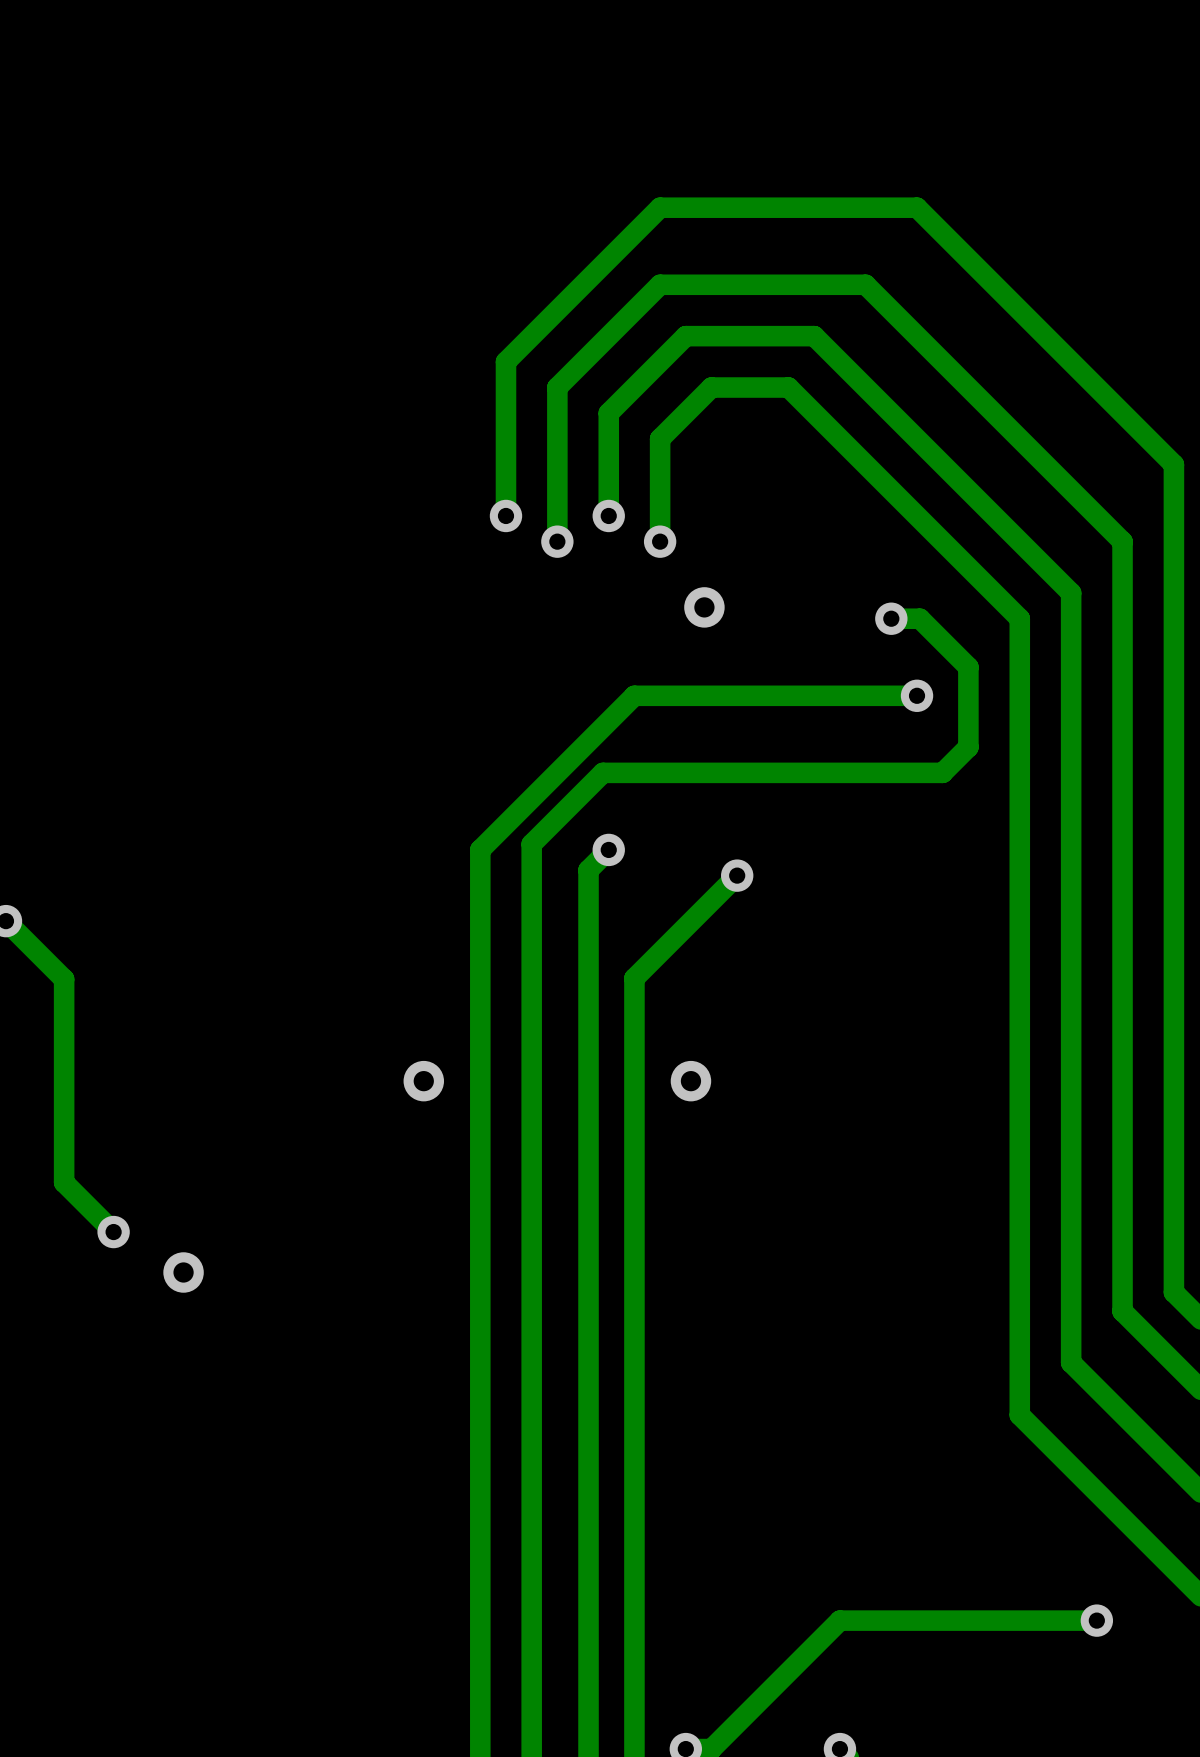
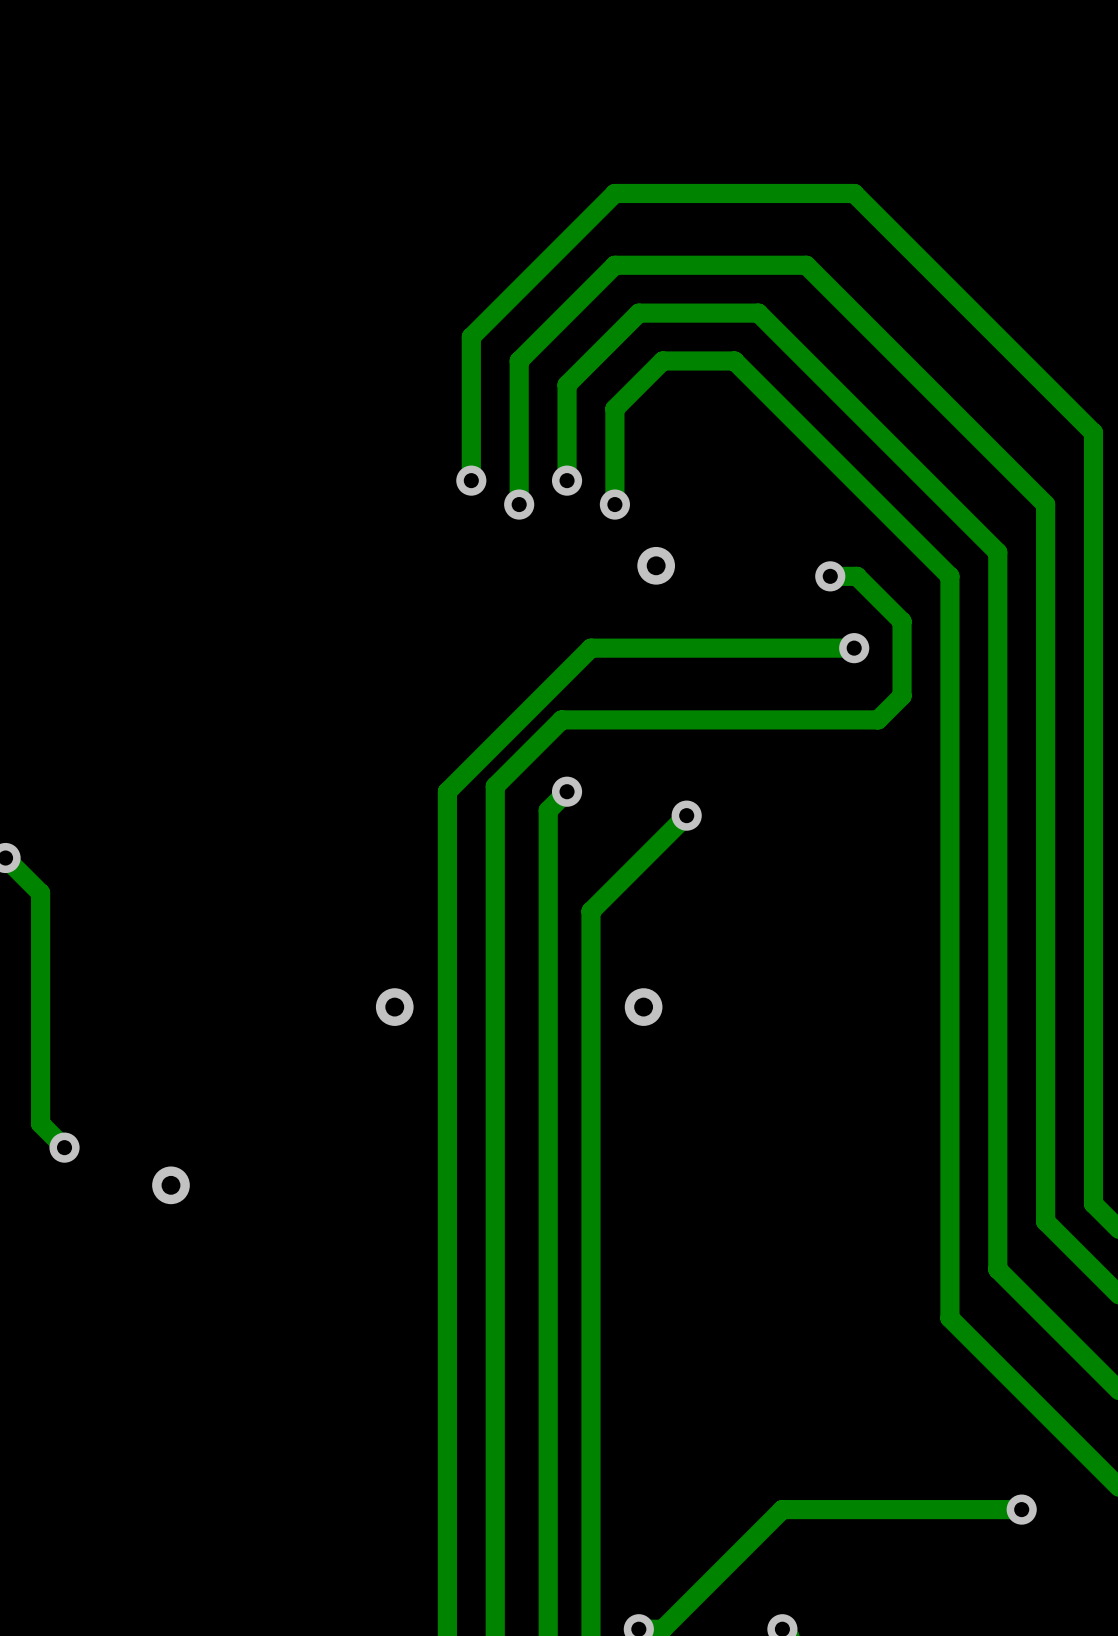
track: (43, 958) (64, 979) (64, 1182) (113, 1232) -> (40, 893) (40, 1123) (64, 1147)
via position: (113, 1232) -> (64, 1147)

